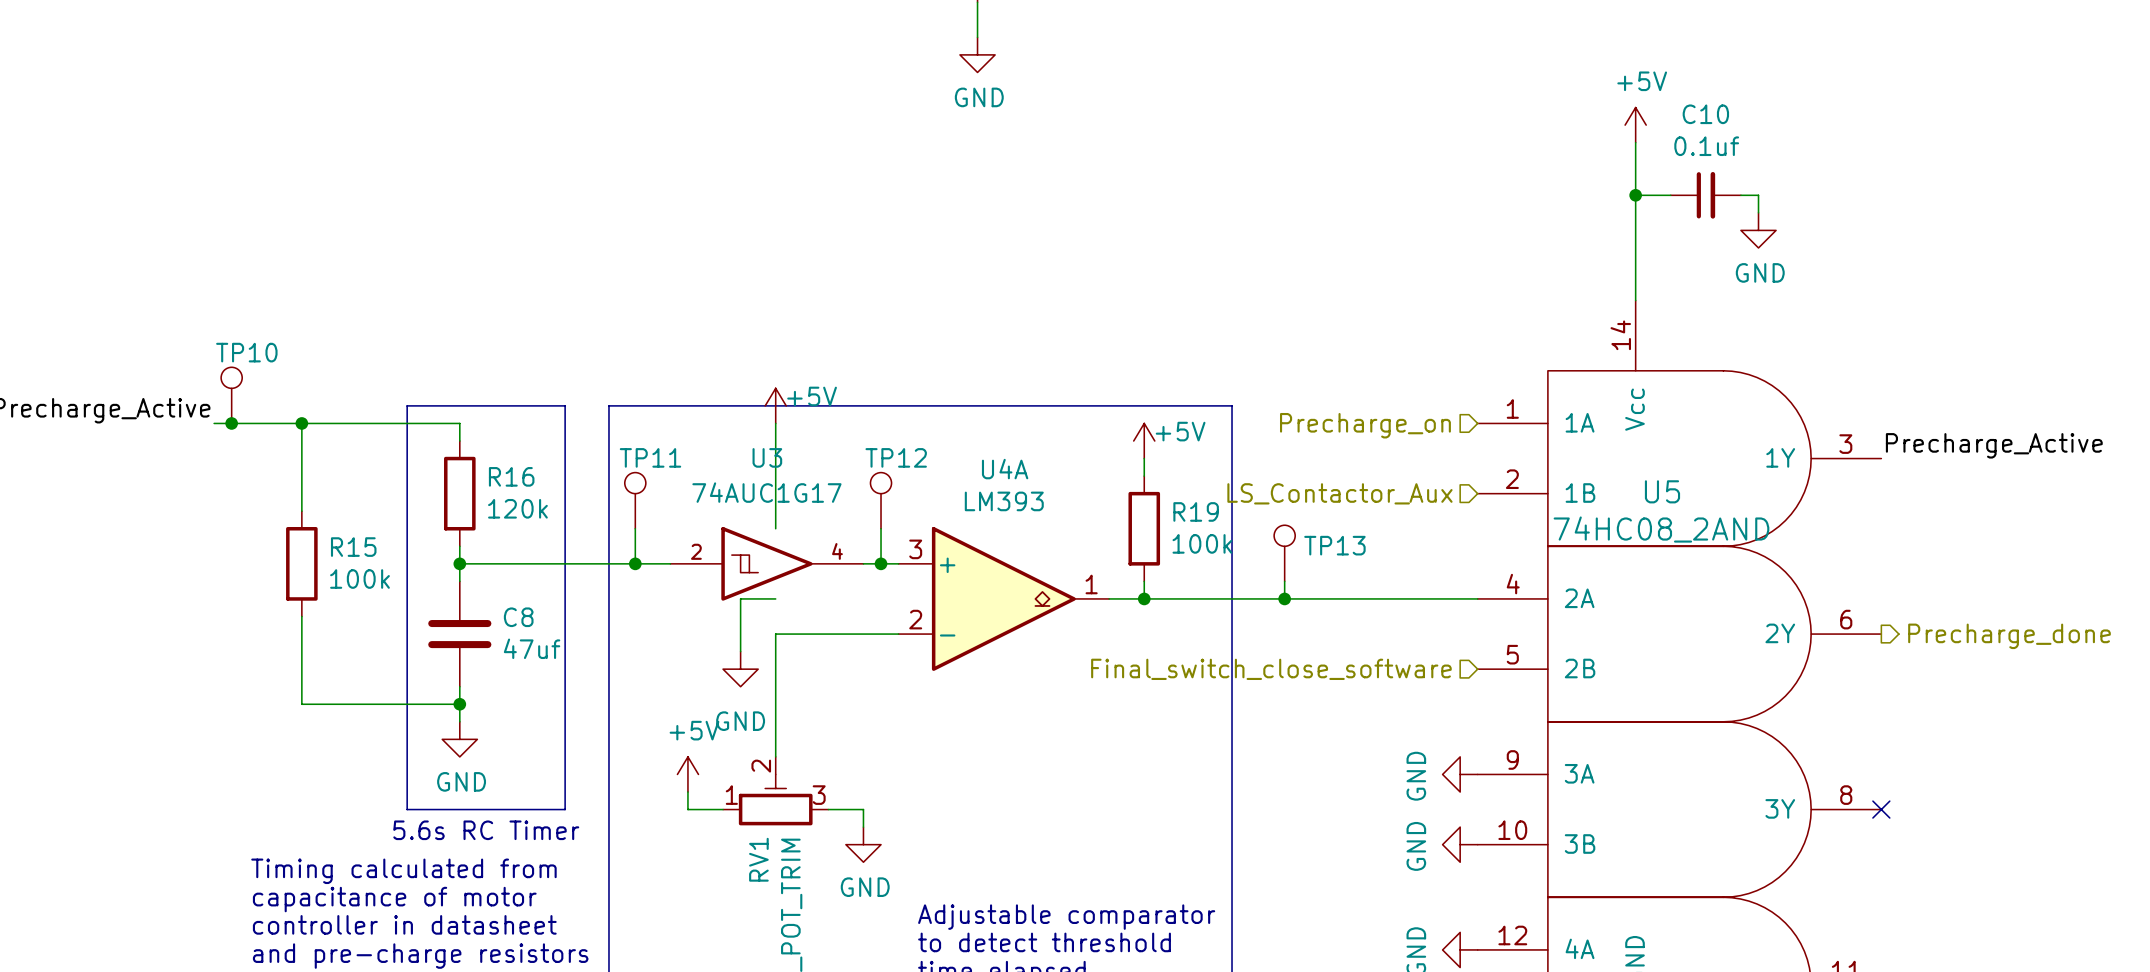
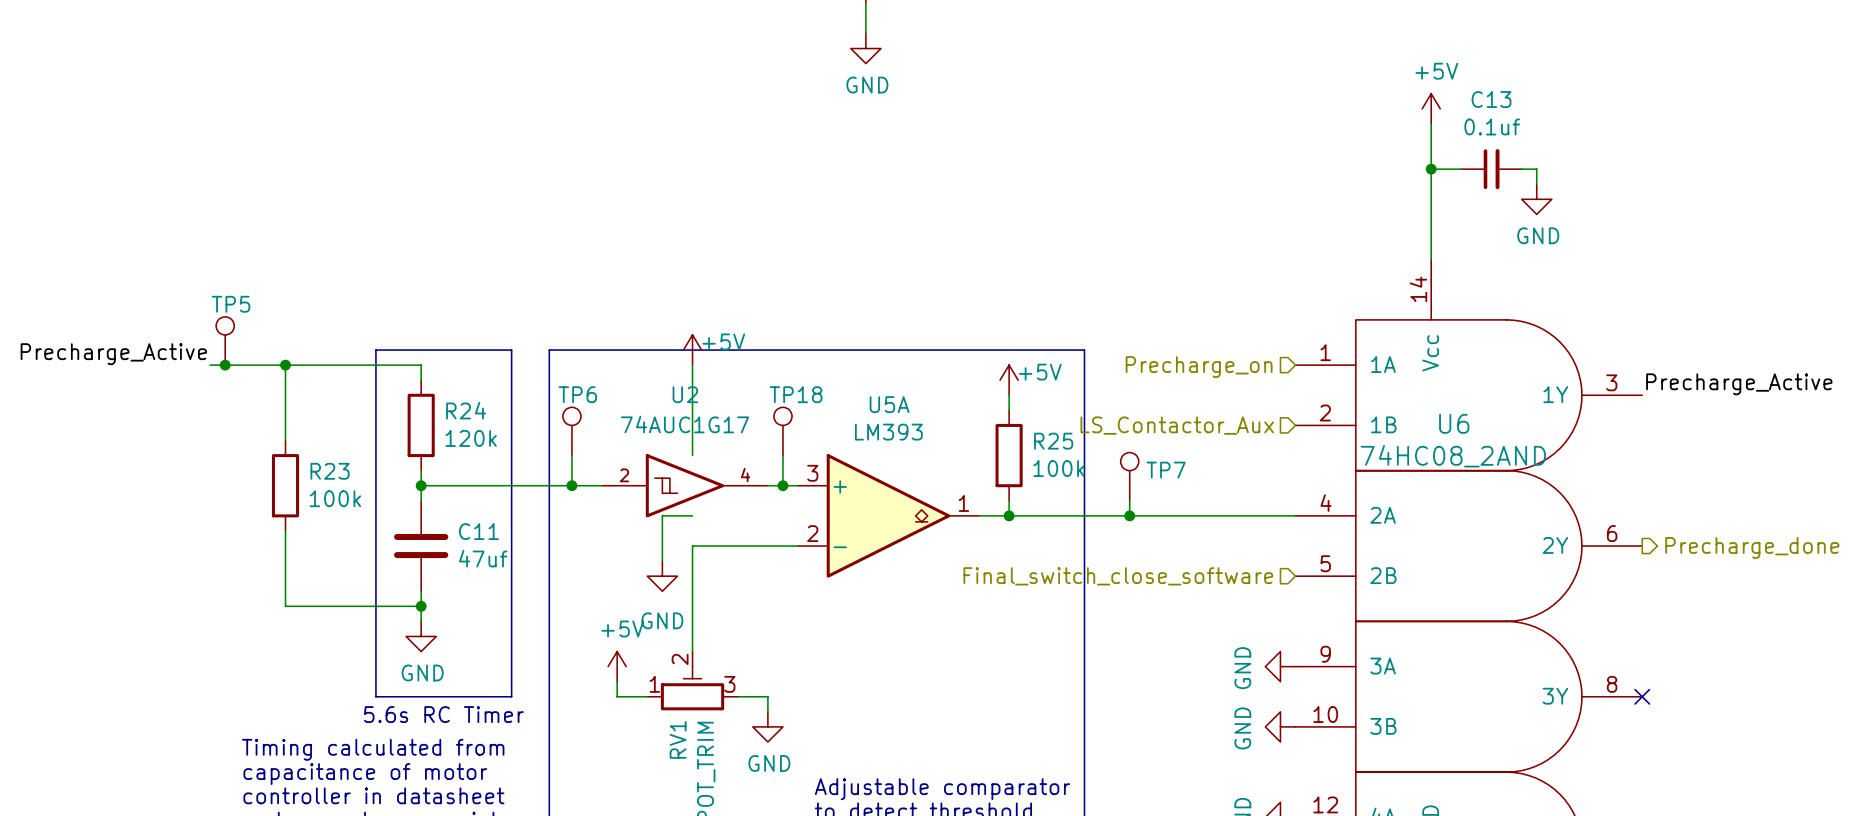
C10 name: C10 (1705, 114) -> C13 (1491, 99)
TP10 name: TP10 (246, 352) -> TP5 (231, 304)
TP11 name: TP11 (650, 457) -> TP6 (577, 394)
U3 name: U3 (767, 457) -> U2 (685, 394)
TP12 name: TP12 (896, 457) -> TP18 (796, 394)
U4A name: U4A (1005, 469) -> U5A (889, 404)
R16 name: R16 (511, 476) -> R24 (466, 410)
U5 name: U5 (1662, 491) -> U6 (1454, 423)
R19 name: R19 (1196, 511) -> R25 (1053, 441)
TP13 name: TP13 (1334, 545) -> TP7 (1166, 470)
R15 name: R15 (353, 547) -> R23 (330, 471)
C8 name: C8 (518, 617) -> C11 (478, 531)

